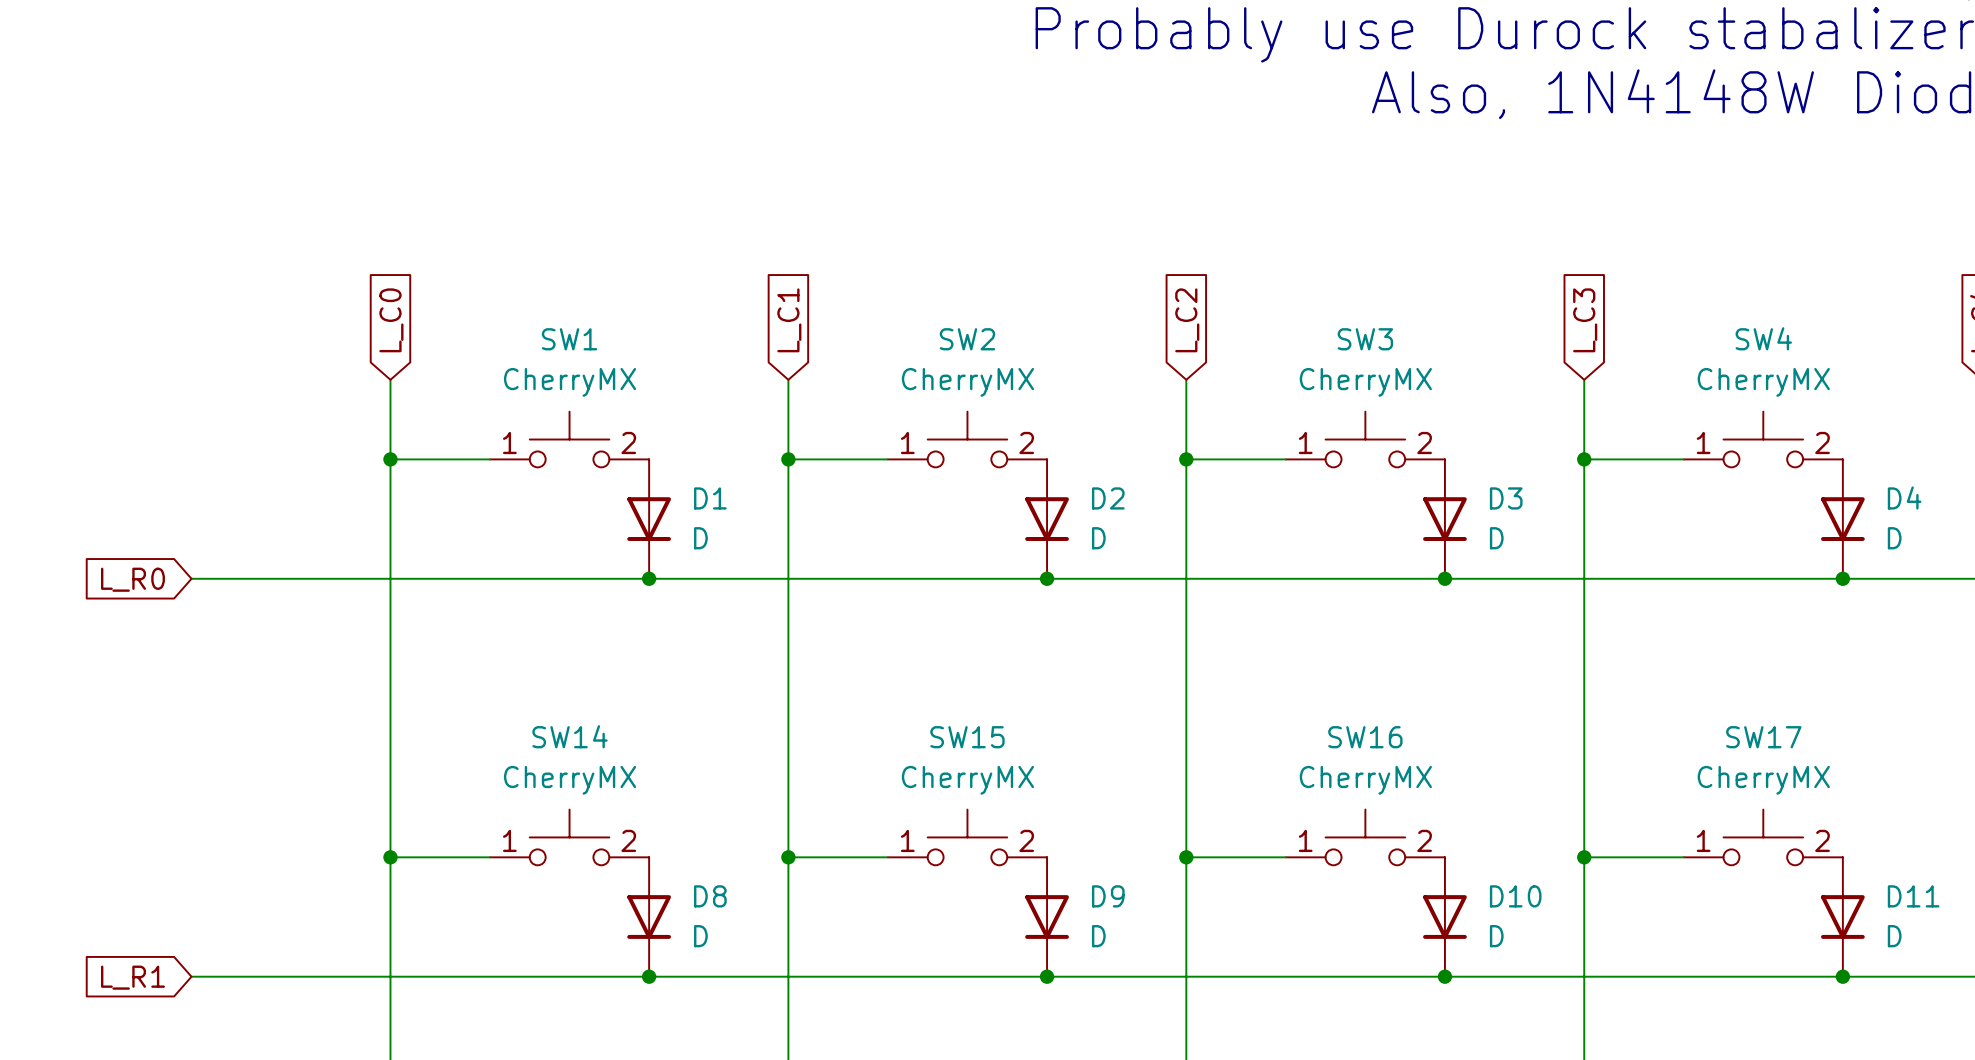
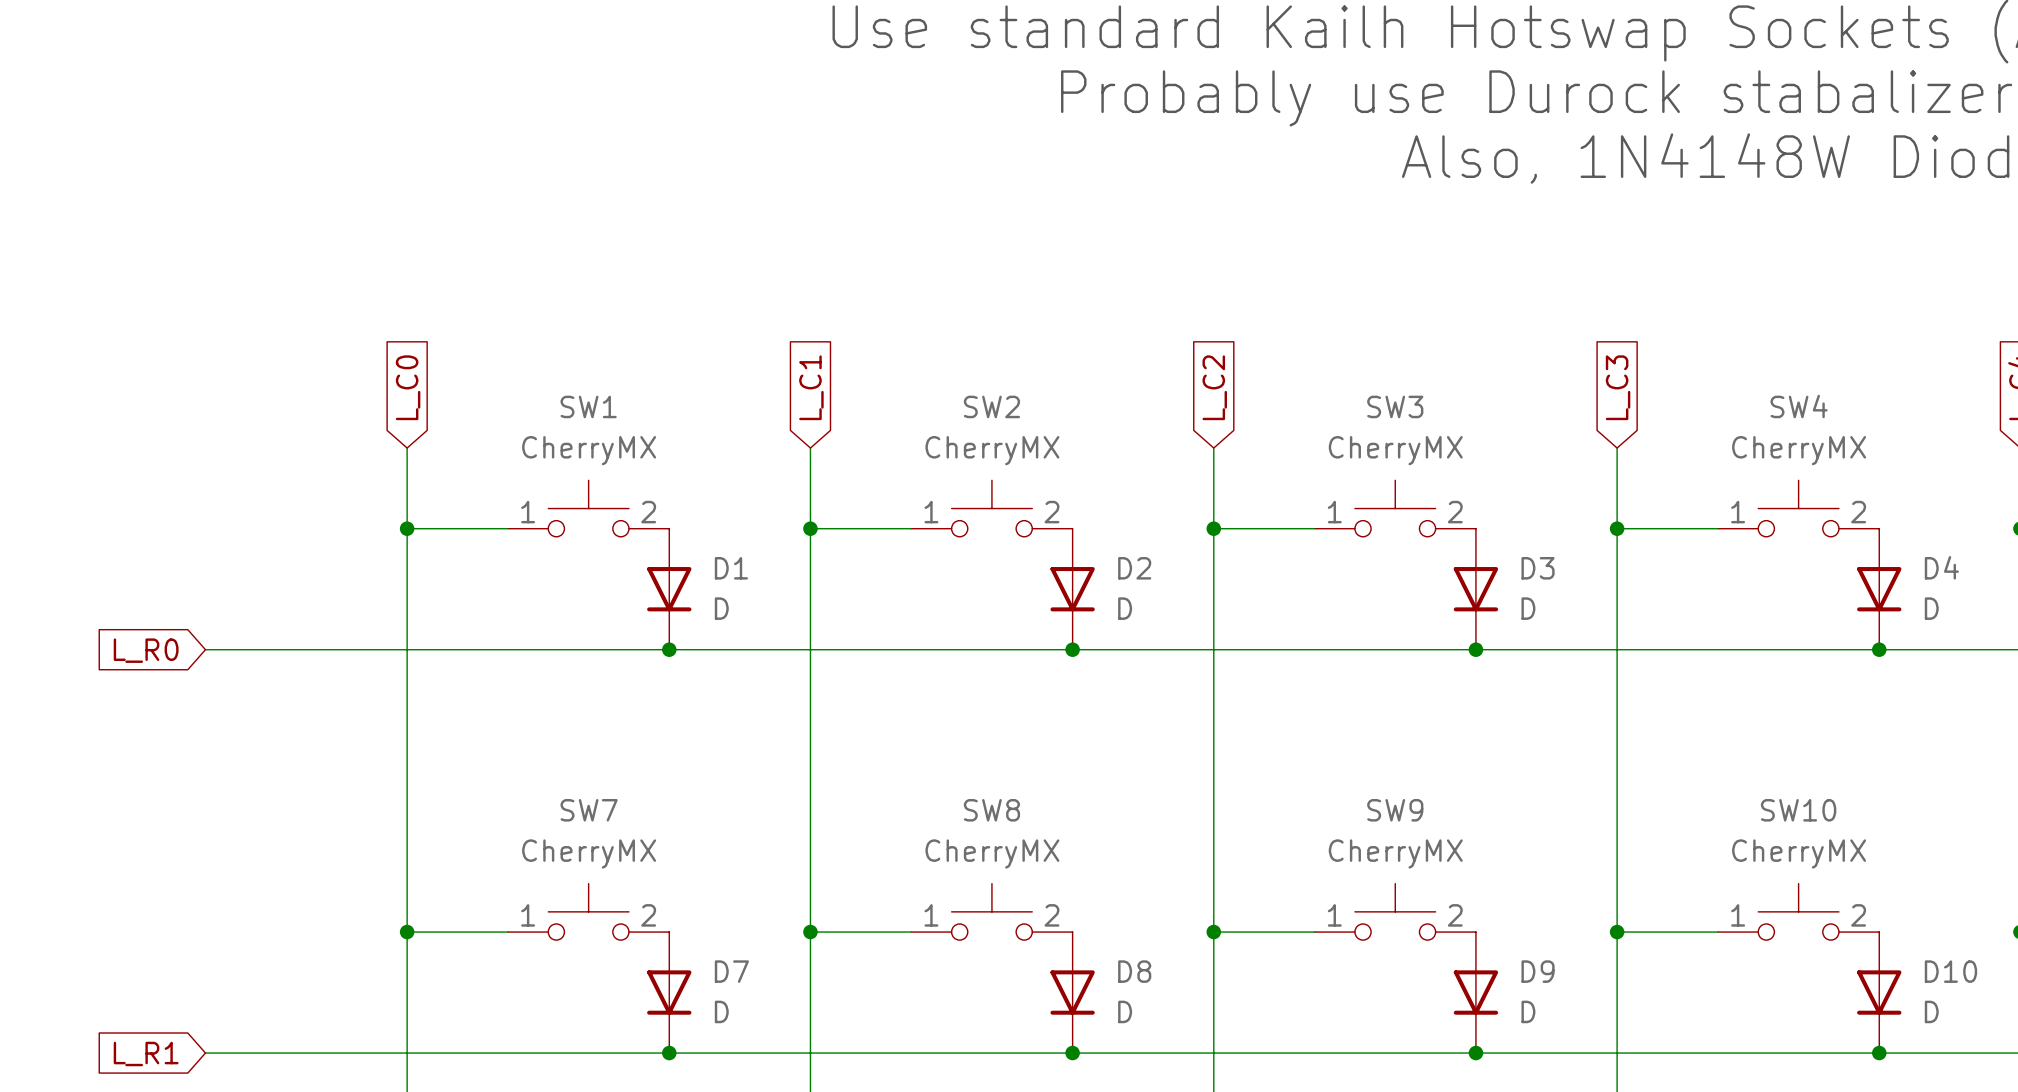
SW14 name: SW14 (570, 736) -> SW7 (589, 810)
SW15 name: SW15 (967, 737) -> SW8 (991, 810)
SW16 name: SW16 (1365, 737) -> SW9 (1395, 810)
SW17 name: SW17 (1763, 737) -> SW10 (1798, 810)
D8 name: D8 (710, 896) -> D7 (731, 971)
D9 name: D9 (1108, 896) -> D8 (1134, 971)
D10 name: D10 (1515, 896) -> D9 (1538, 971)
D11 name: D11 (1913, 896) -> D10 (1950, 971)

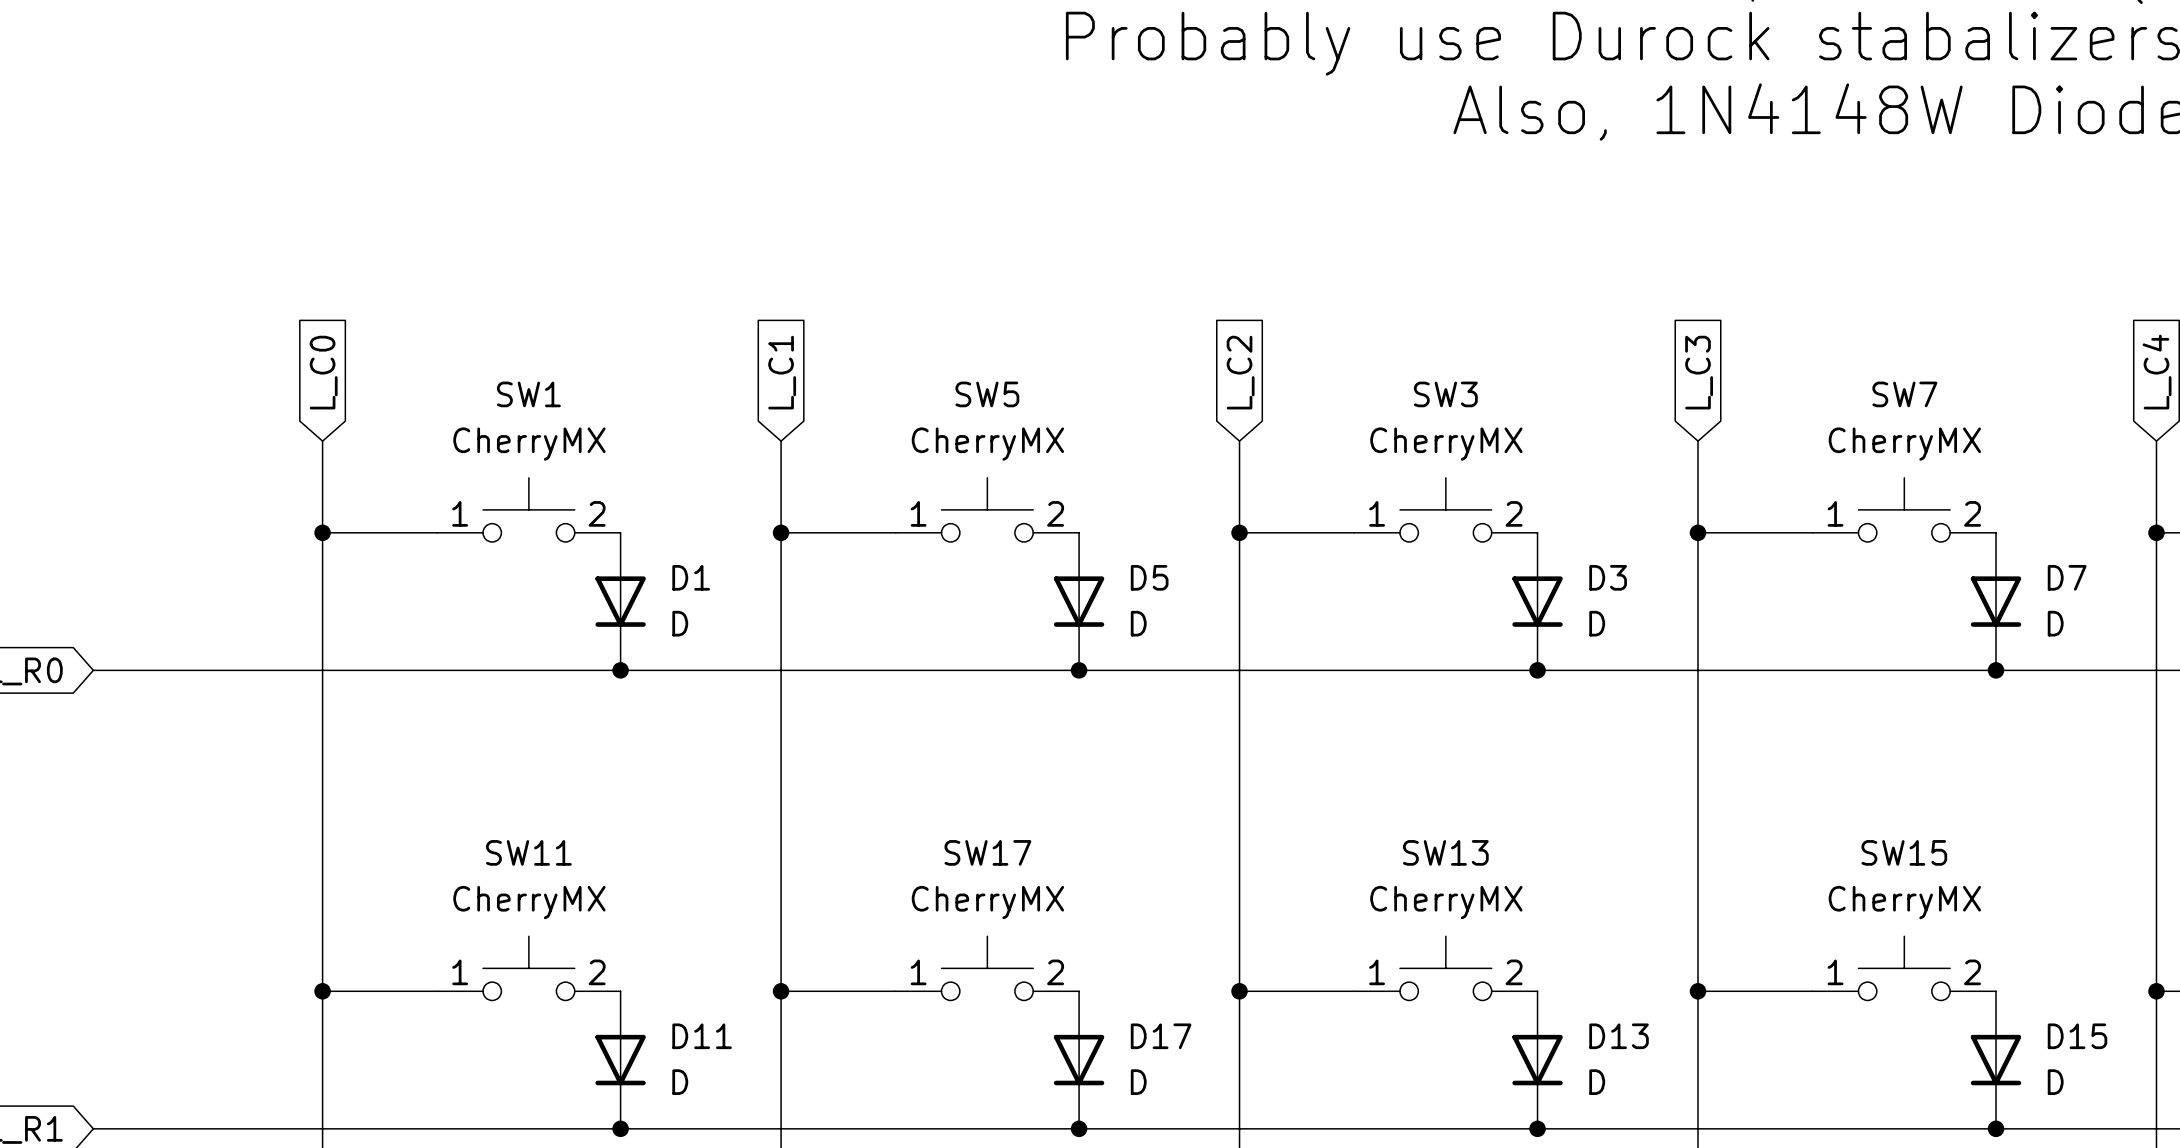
SW2 name: SW2 (991, 406) -> SW5 (987, 394)
SW4 name: SW4 (1799, 406) -> SW7 (1904, 394)
D4 name: D4 (1941, 567) -> D7 (2067, 577)
D2 name: D2 (1134, 568) -> D5 (1149, 577)
SW7 name: SW7 (589, 810) -> SW11 (528, 852)
SW8 name: SW8 (991, 810) -> SW17 (987, 852)
SW9 name: SW9 (1395, 810) -> SW13 (1445, 852)
SW10 name: SW10 (1798, 810) -> SW15 (1904, 852)
D7 name: D7 (731, 971) -> D11 (702, 1036)
D8 name: D8 (1134, 971) -> D17 (1161, 1036)
D9 name: D9 (1538, 971) -> D13 (1619, 1036)
D10 name: D10 (1950, 971) -> D15 (2077, 1036)

